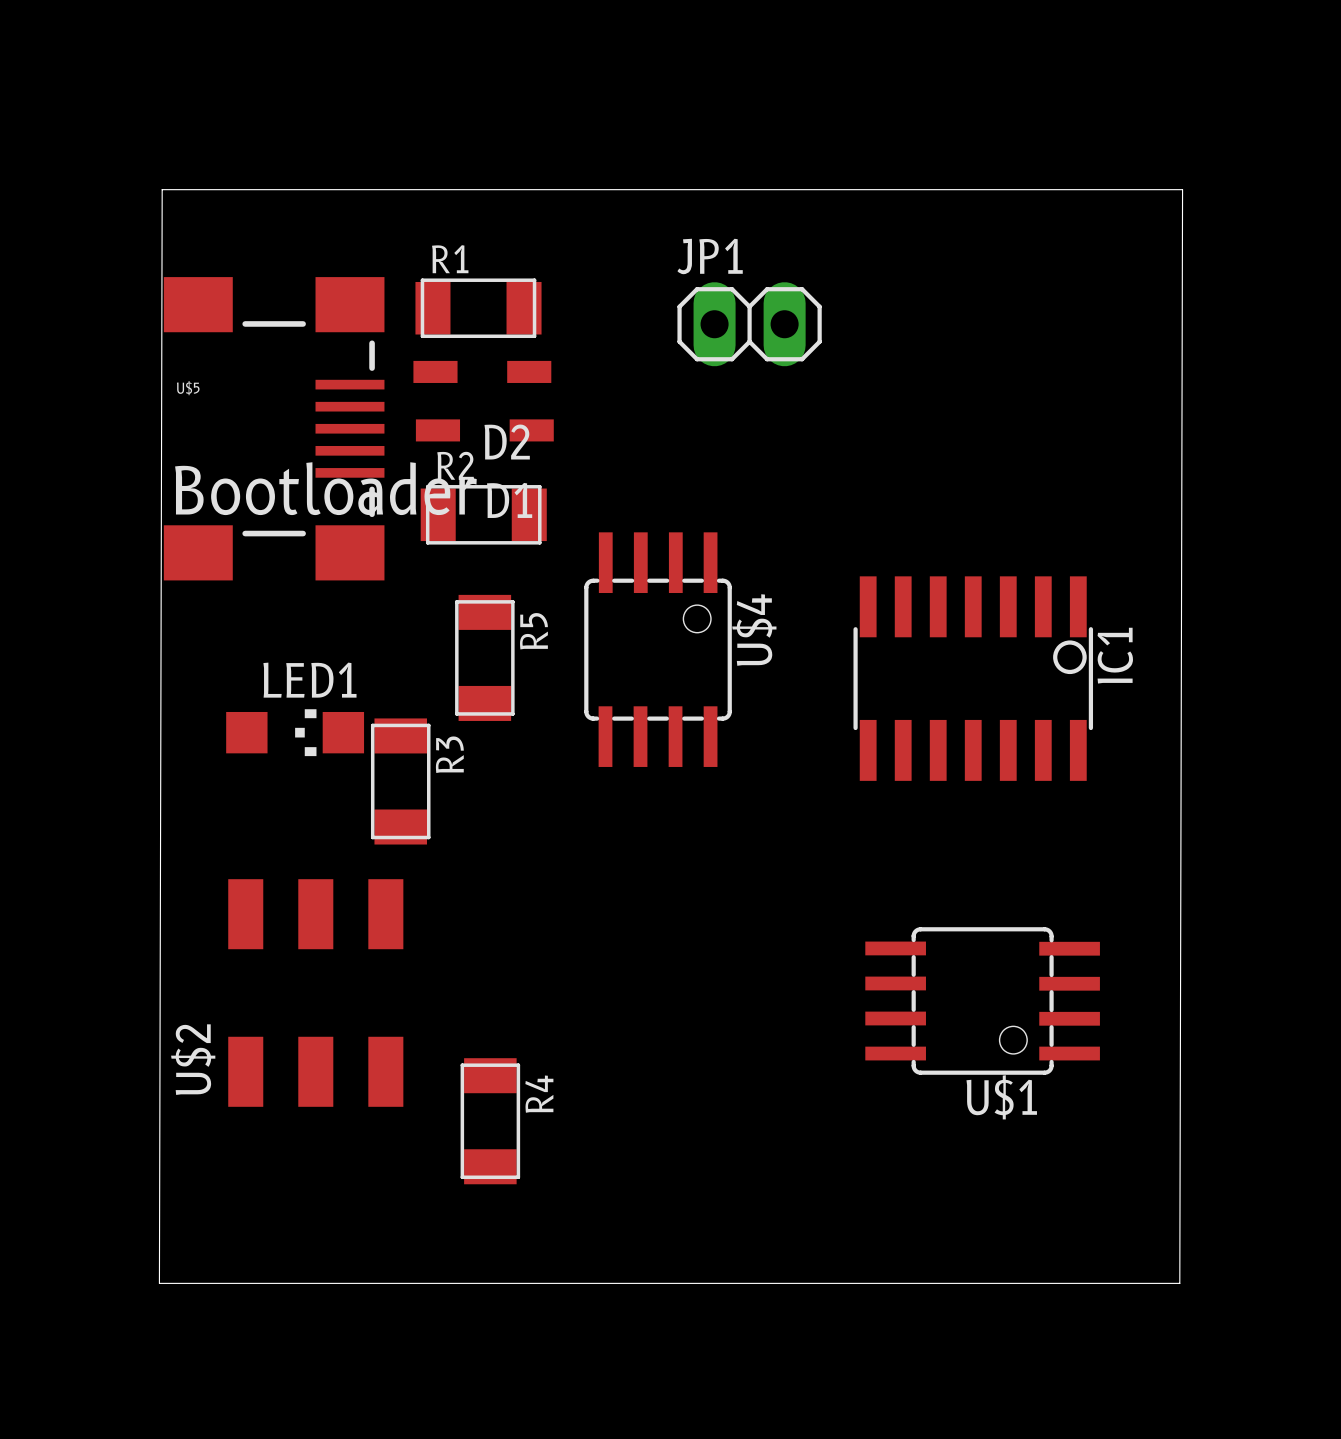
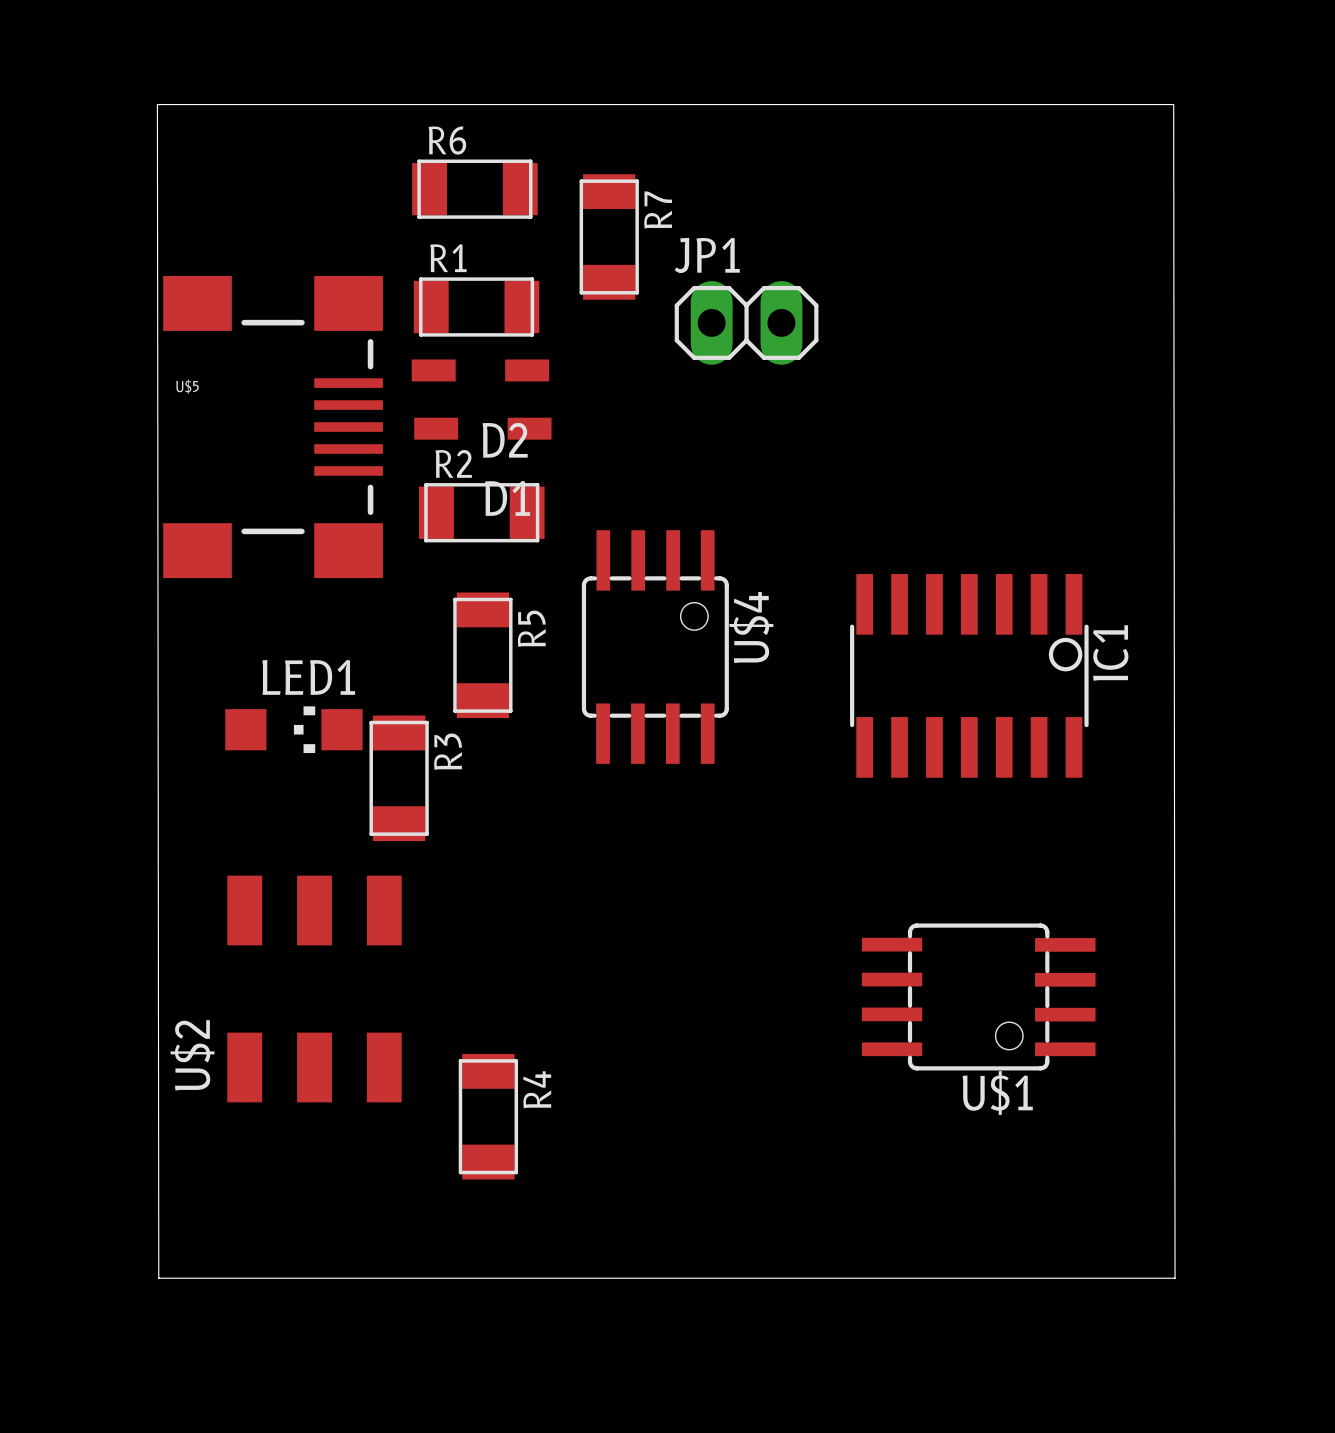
R6: none -> (474, 189)
R7: none -> (609, 236)
text: Bootloader (325, 488) -> none
board edge: (159, 1283) (162, 189) (1182, 189) (1179, 1283) -> (158, 1278) (157, 104) (1173, 104) (1175, 1278)

